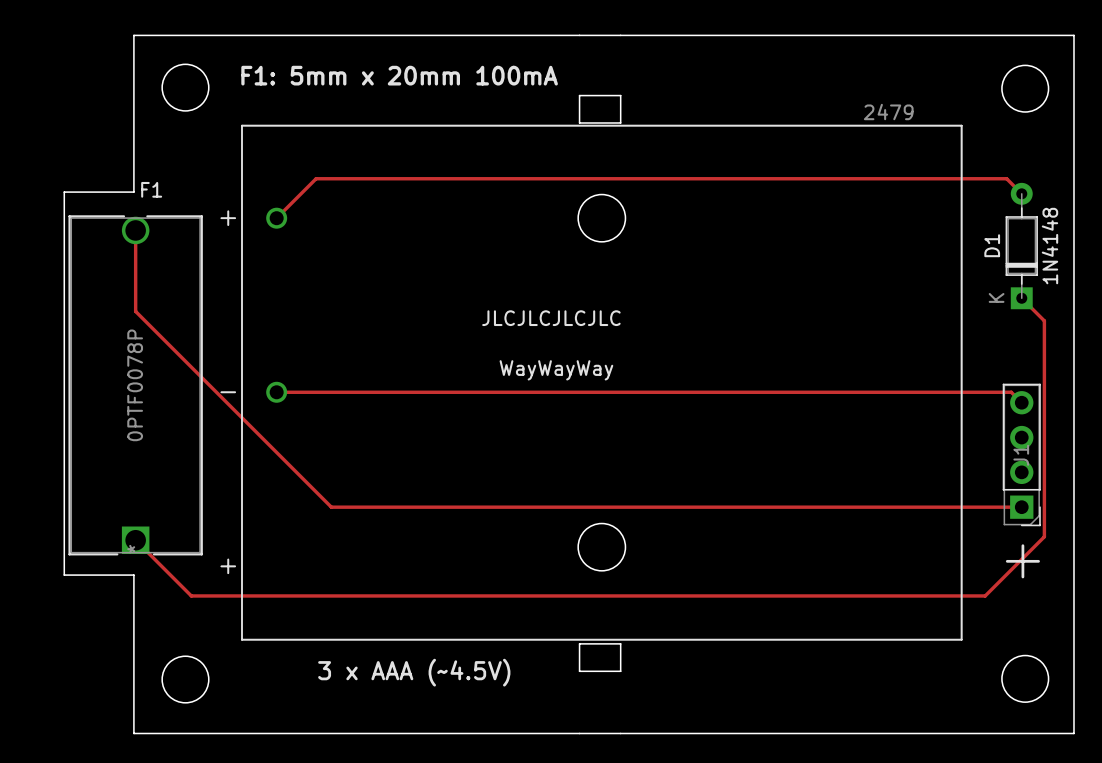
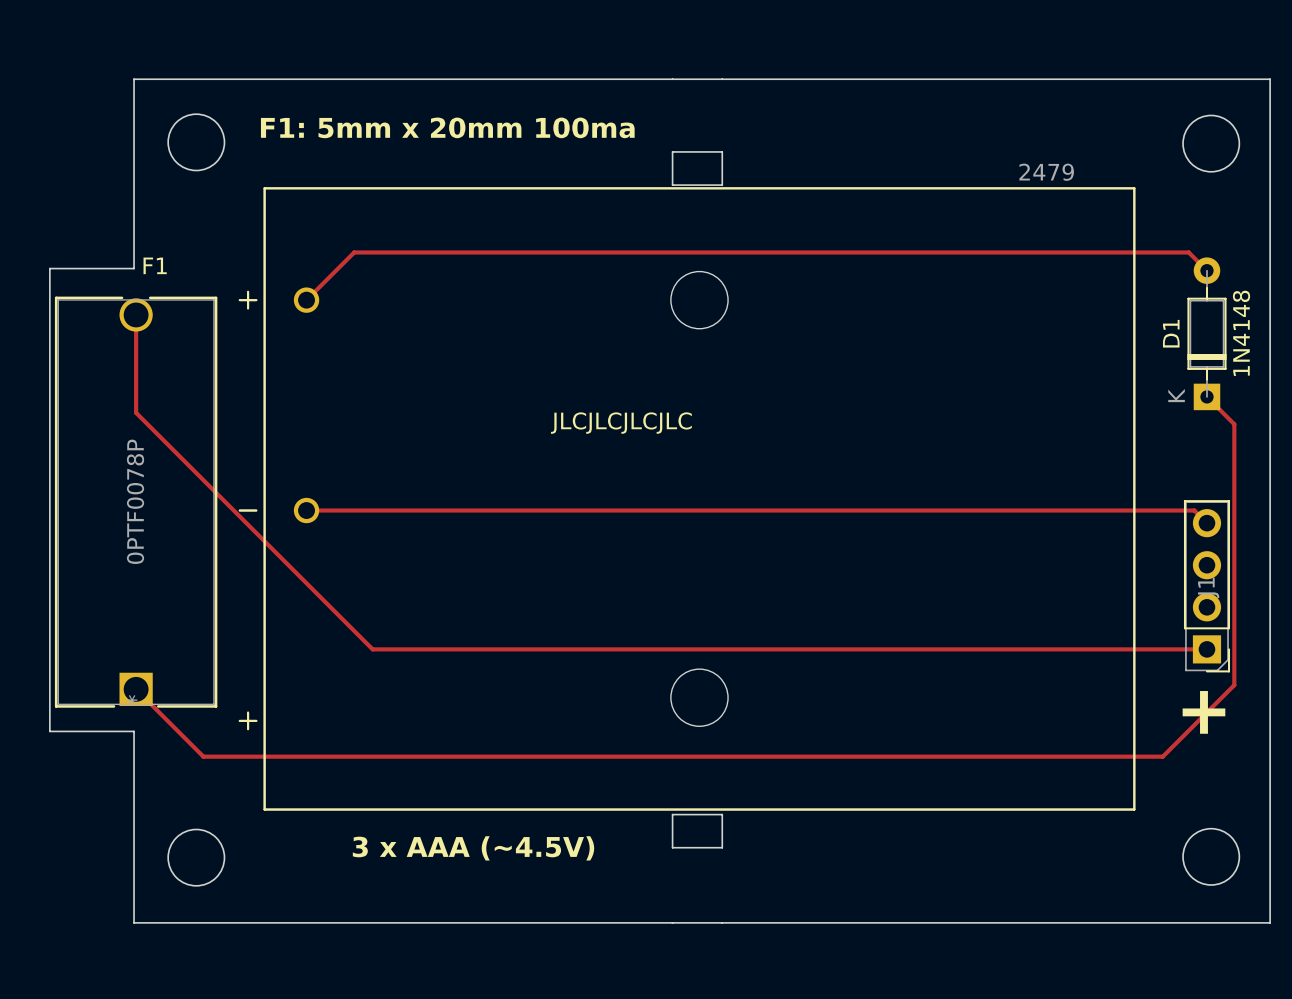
text: F1: 5mm x 20mm 100mA (399, 75) -> F1: 5mm x 20mm 100ma (447, 127)
text: WayWayWay (556, 370) -> none

